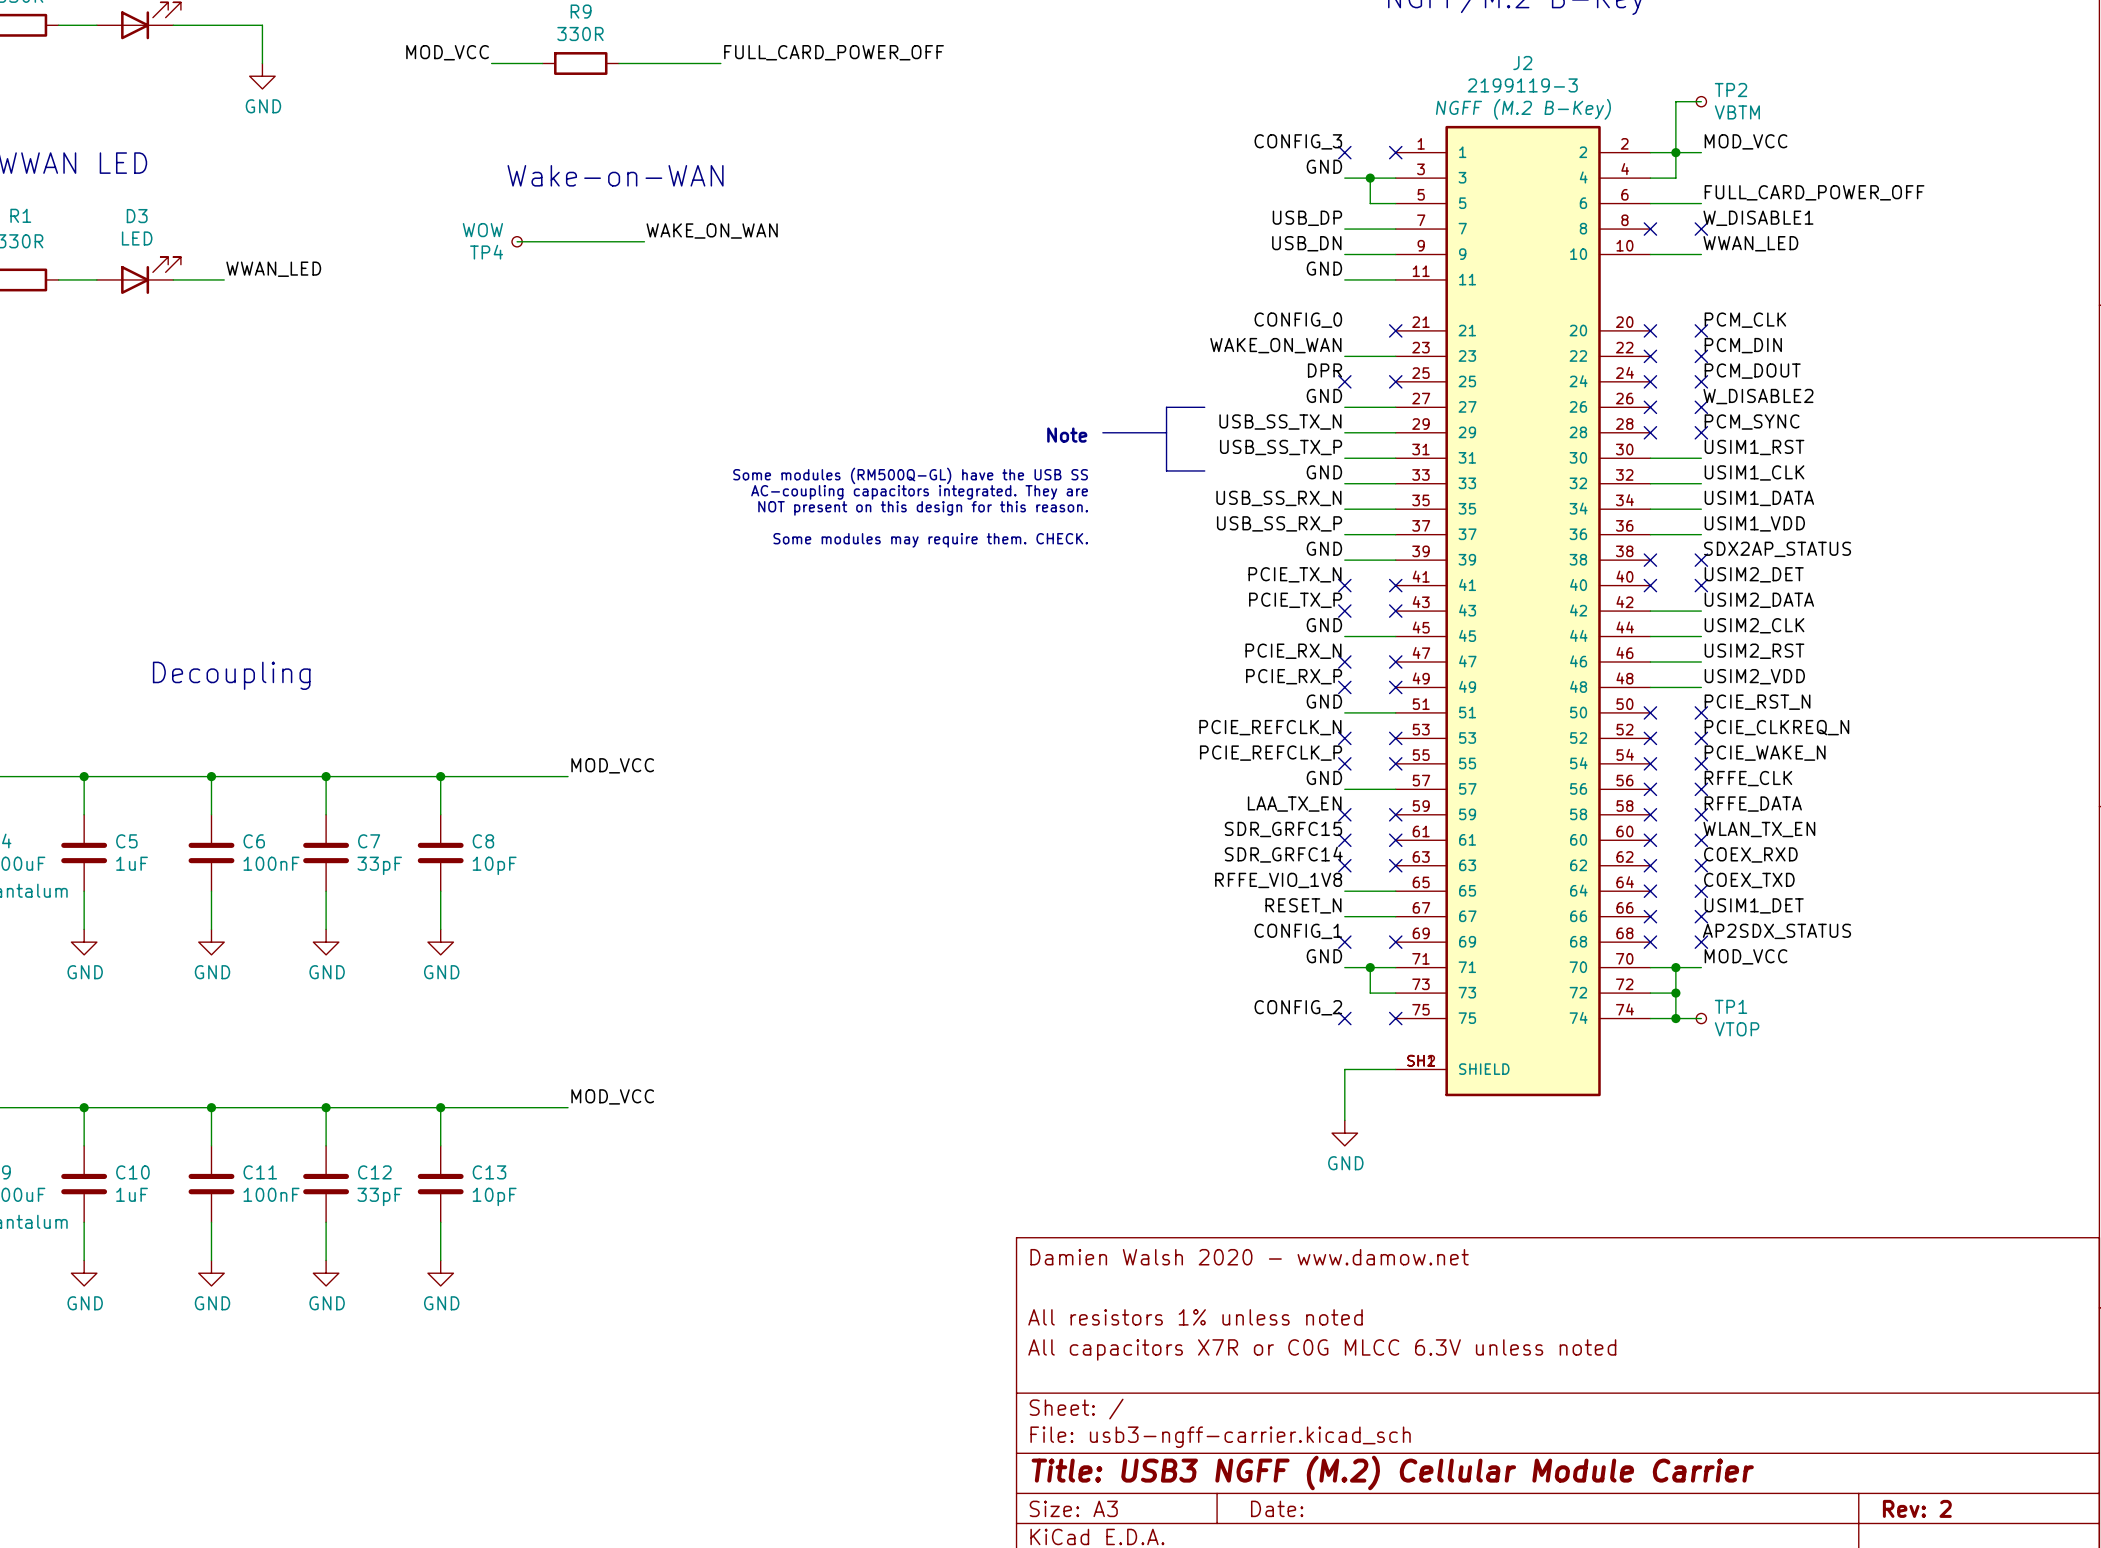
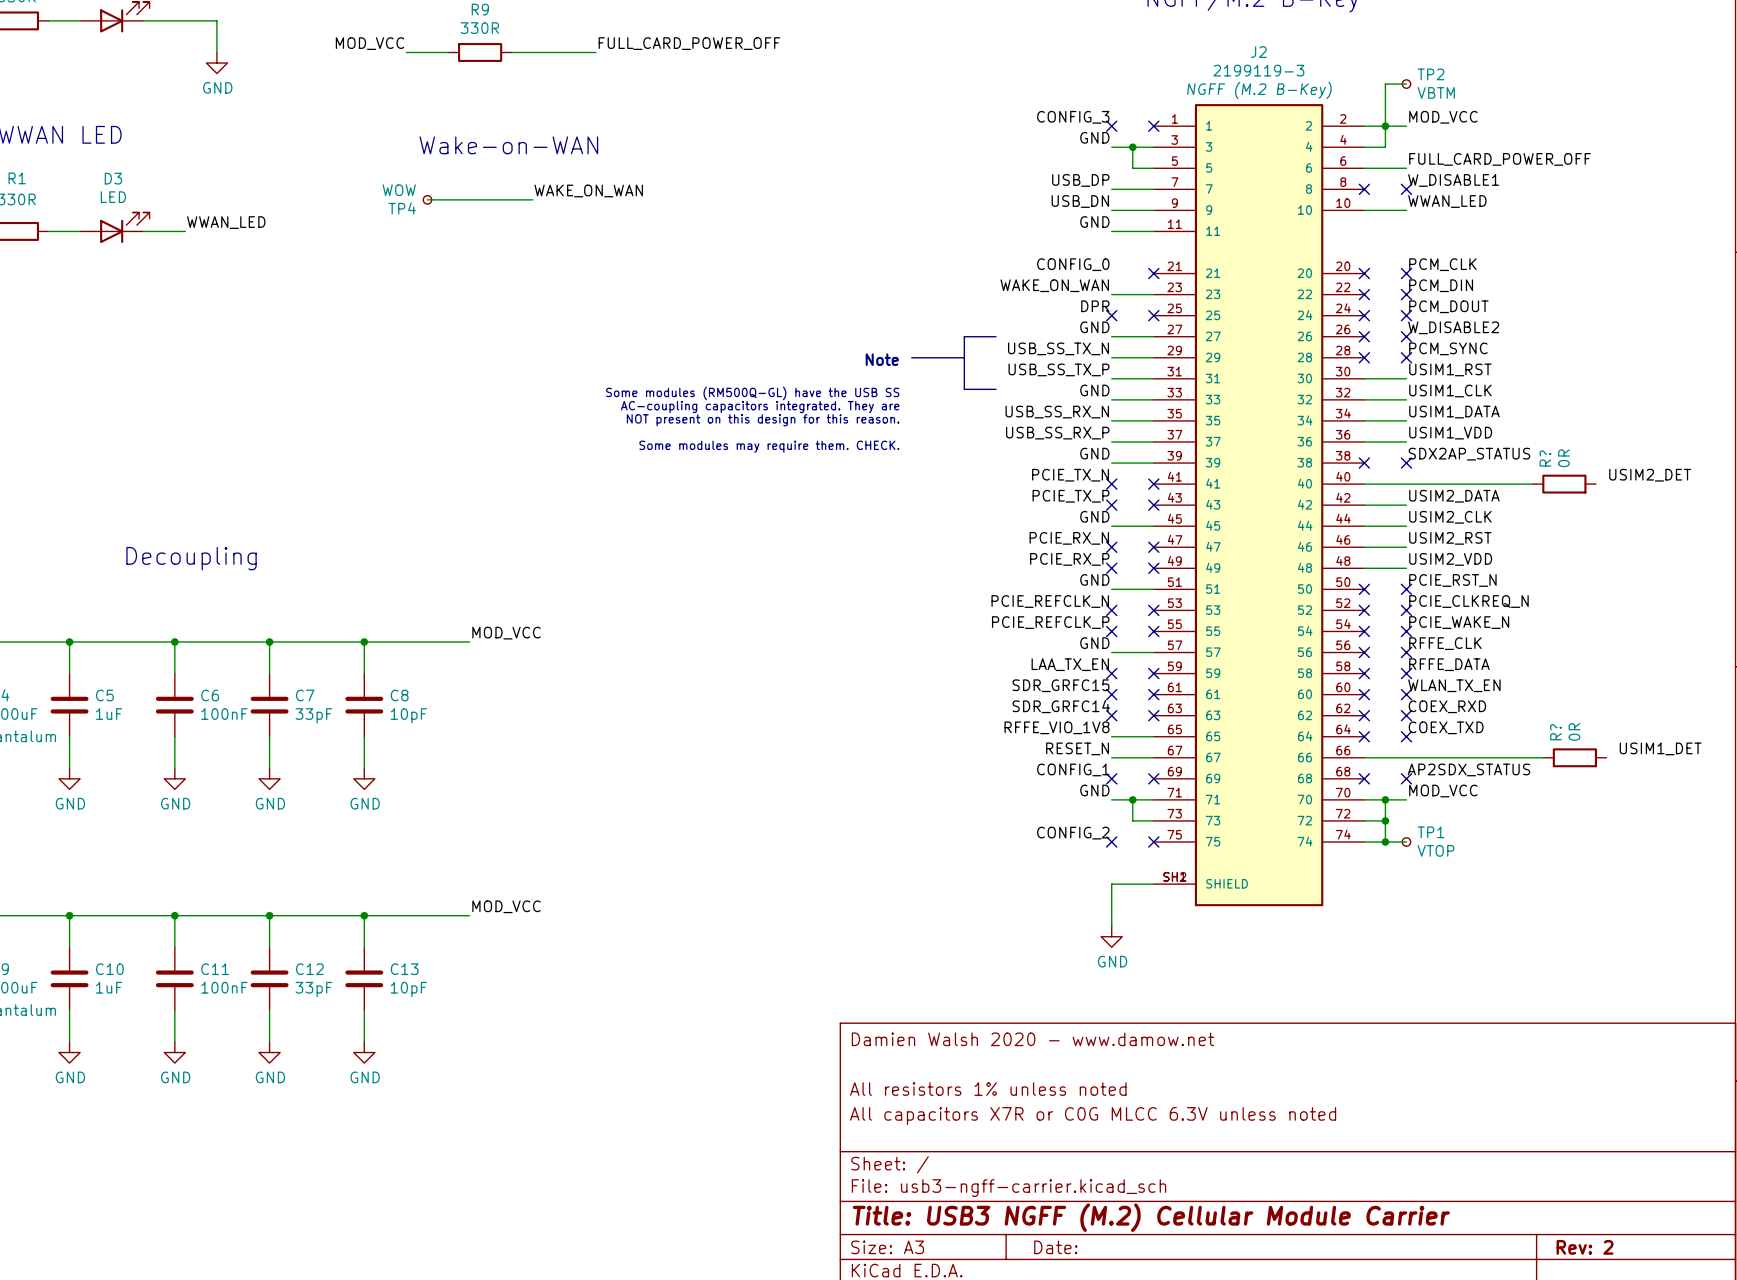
label position: USIM2_DET (1754, 574) -> USIM2_DET (1650, 475)
wire: none -> (1364, 484) (1532, 484)
no-connect mark: (1650, 585) -> none
no-connect mark: (1701, 585) -> none
R?: none -> 0R (1564, 484)
label: USIM1_DET (1754, 905) -> none
label: none -> USIM1_DET (1660, 748)
wire: none -> (1364, 757) (1543, 757)
no-connect mark: (1650, 916) -> none
no-connect mark: (1701, 916) -> none
R?: none -> 0R (1574, 757)

